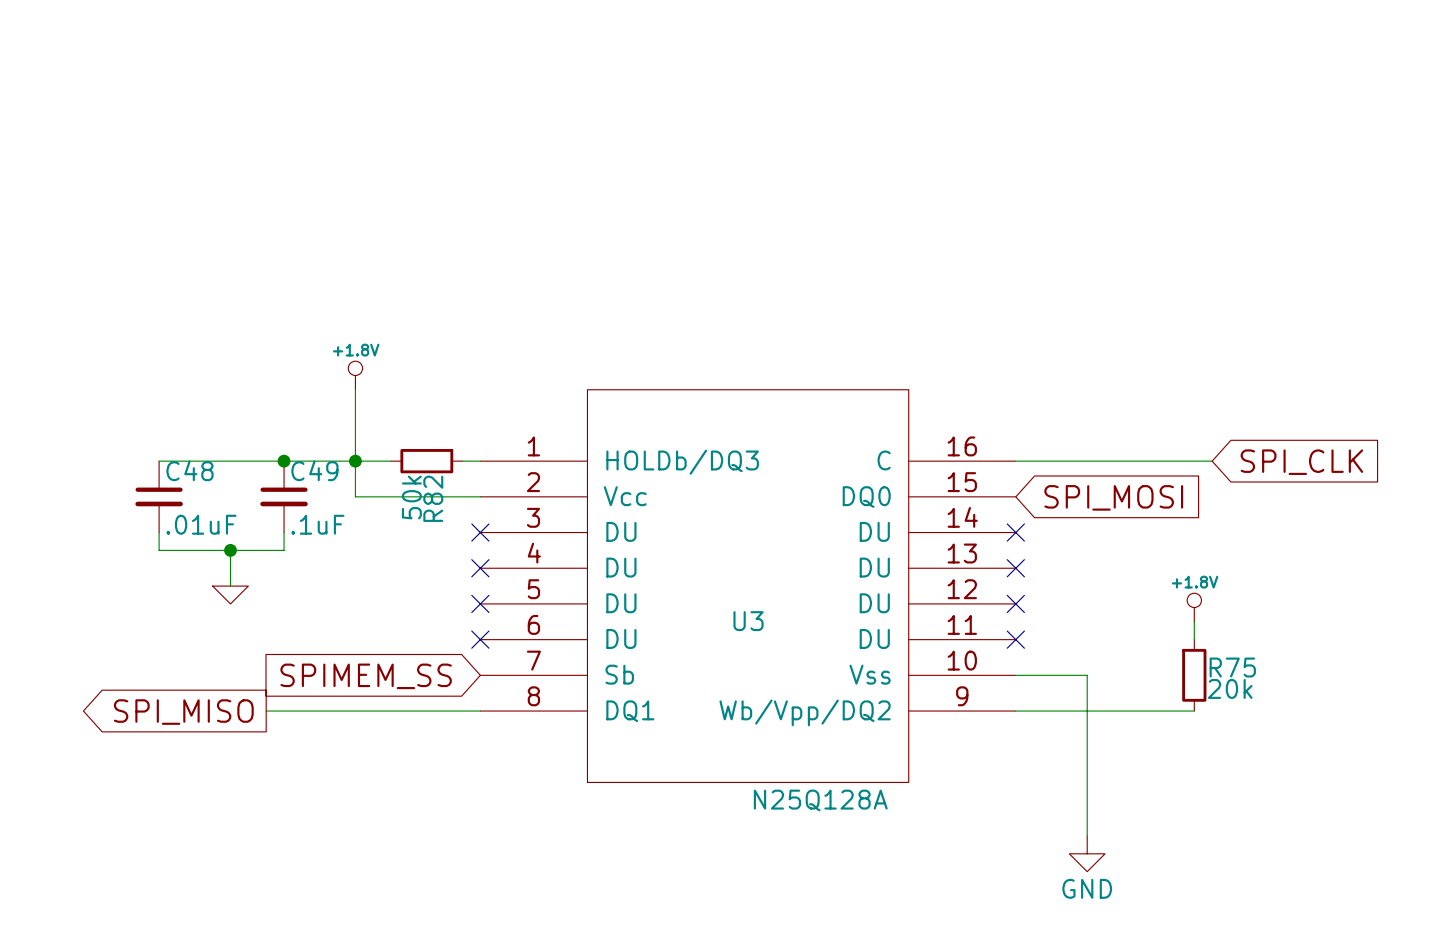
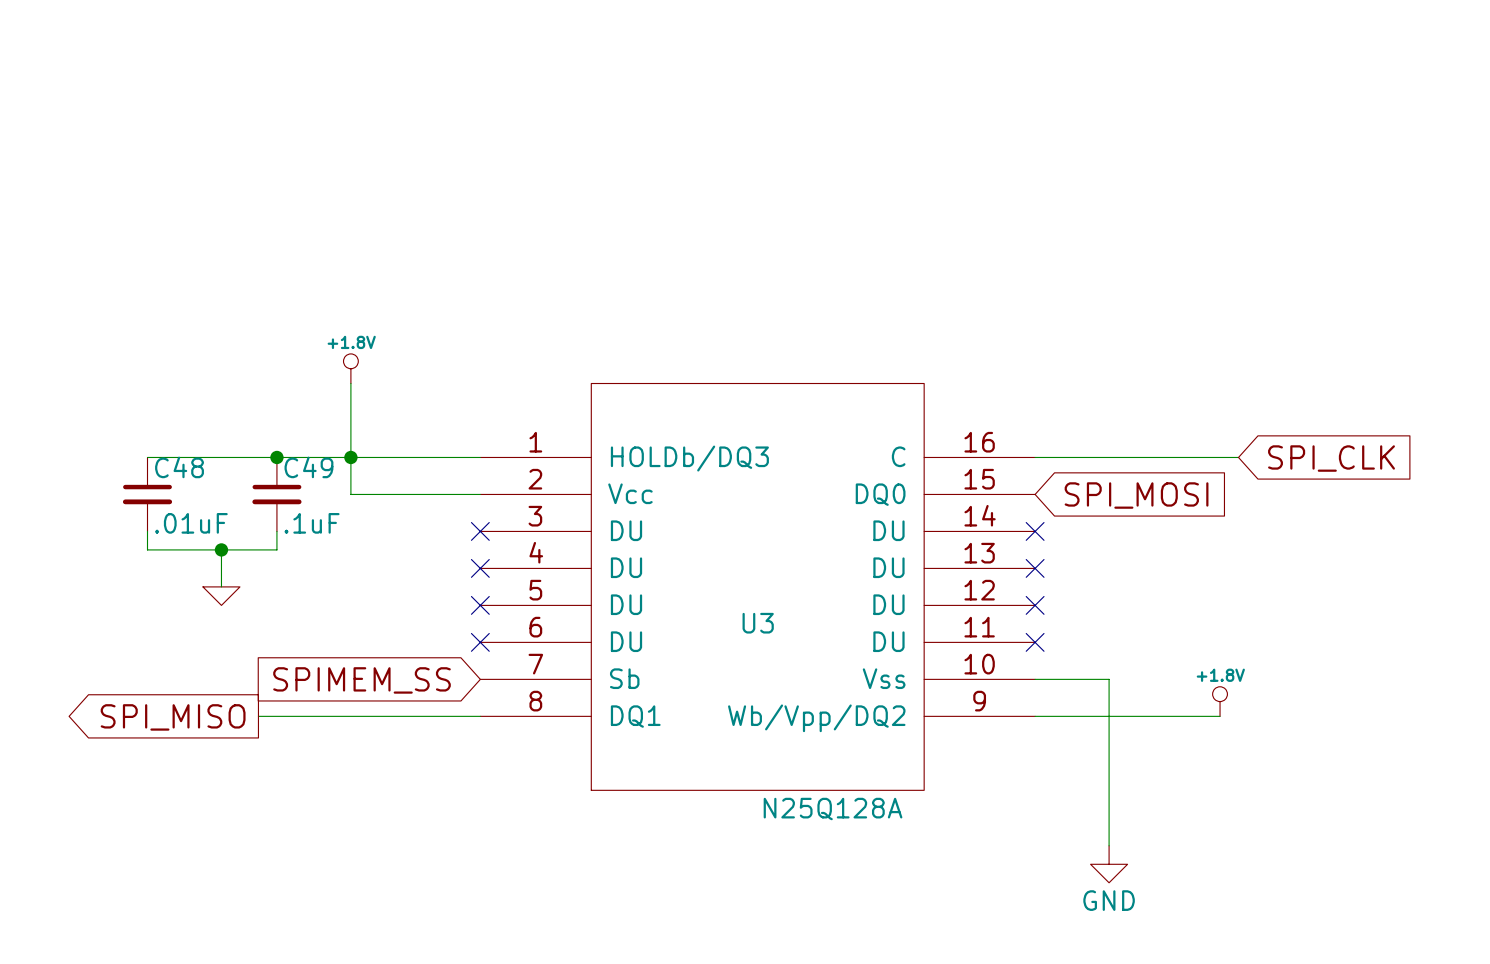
wire: none -> (387, 457) (461, 457)
R82: 50k (426, 461) -> none
power symbol position: +1.8V (1194, 607) -> +1.8V (1220, 701)
wire: (1194, 621) (1194, 639) -> none
R75: 20k (1194, 675) -> none

